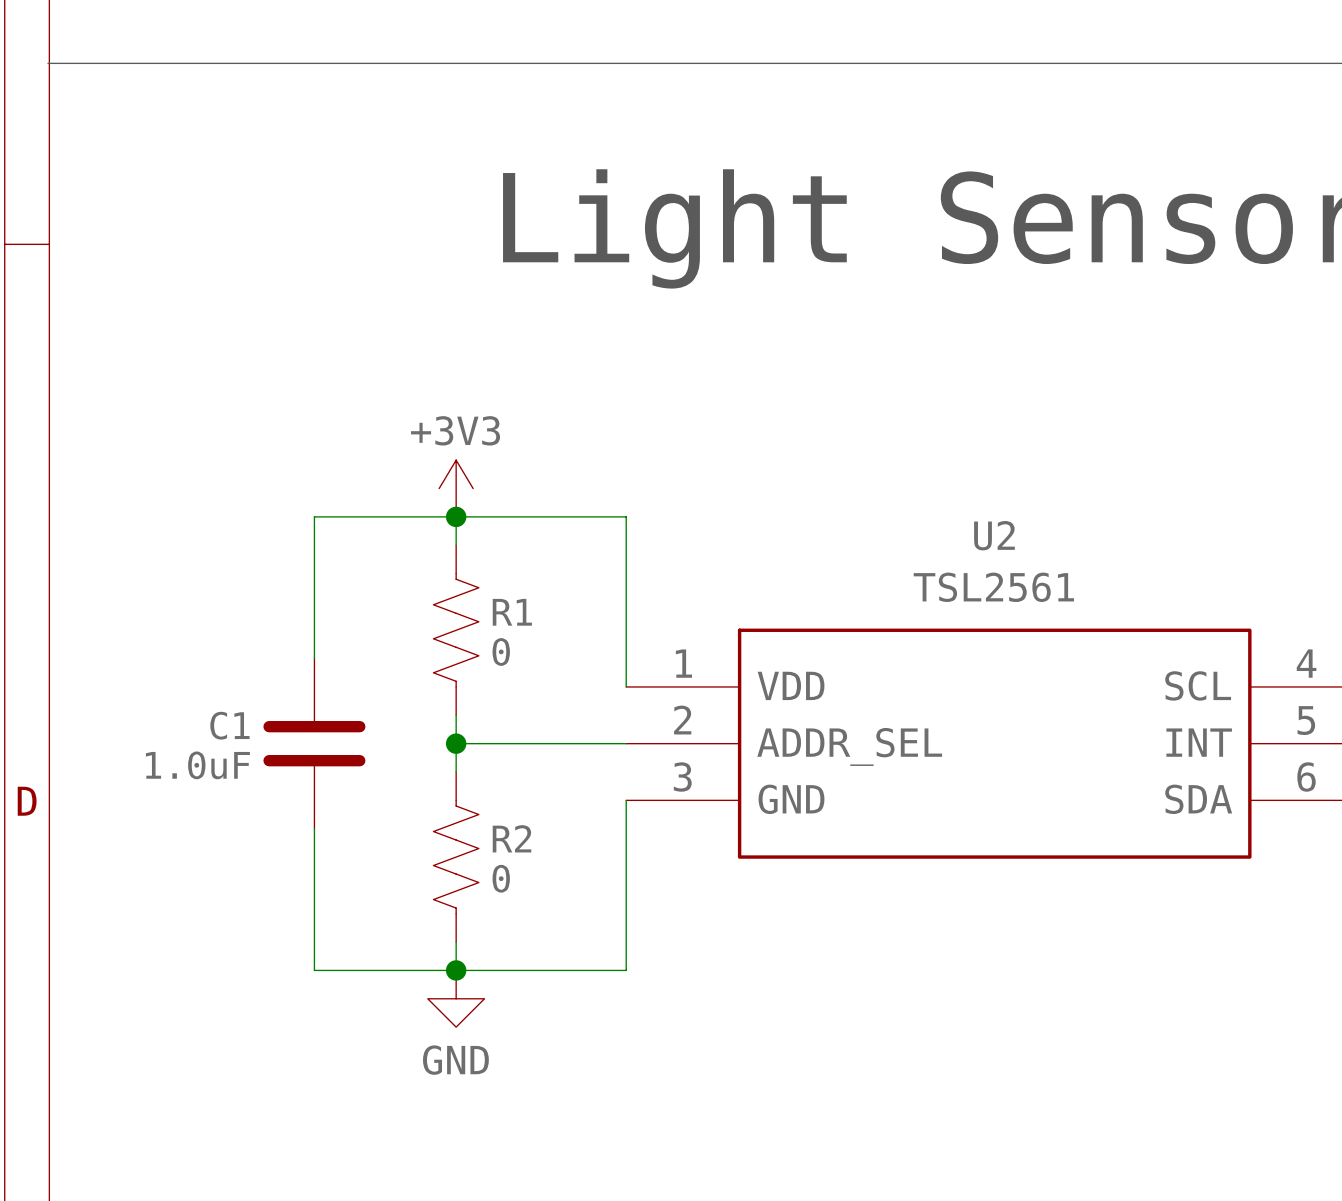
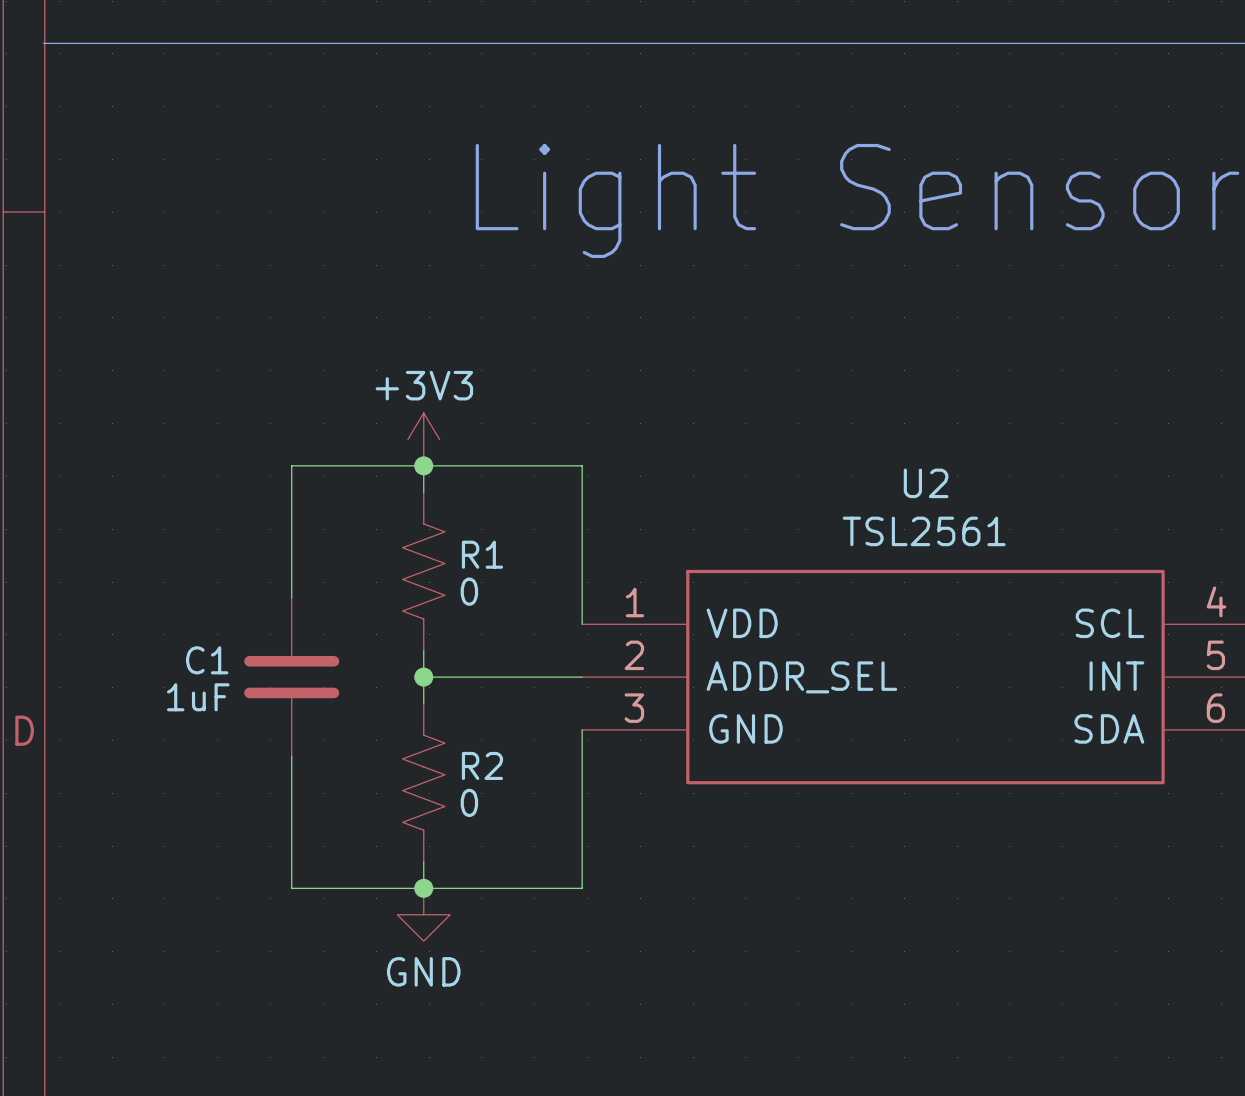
C1 value: 1.0uF (197, 765) -> 1uF (198, 697)

